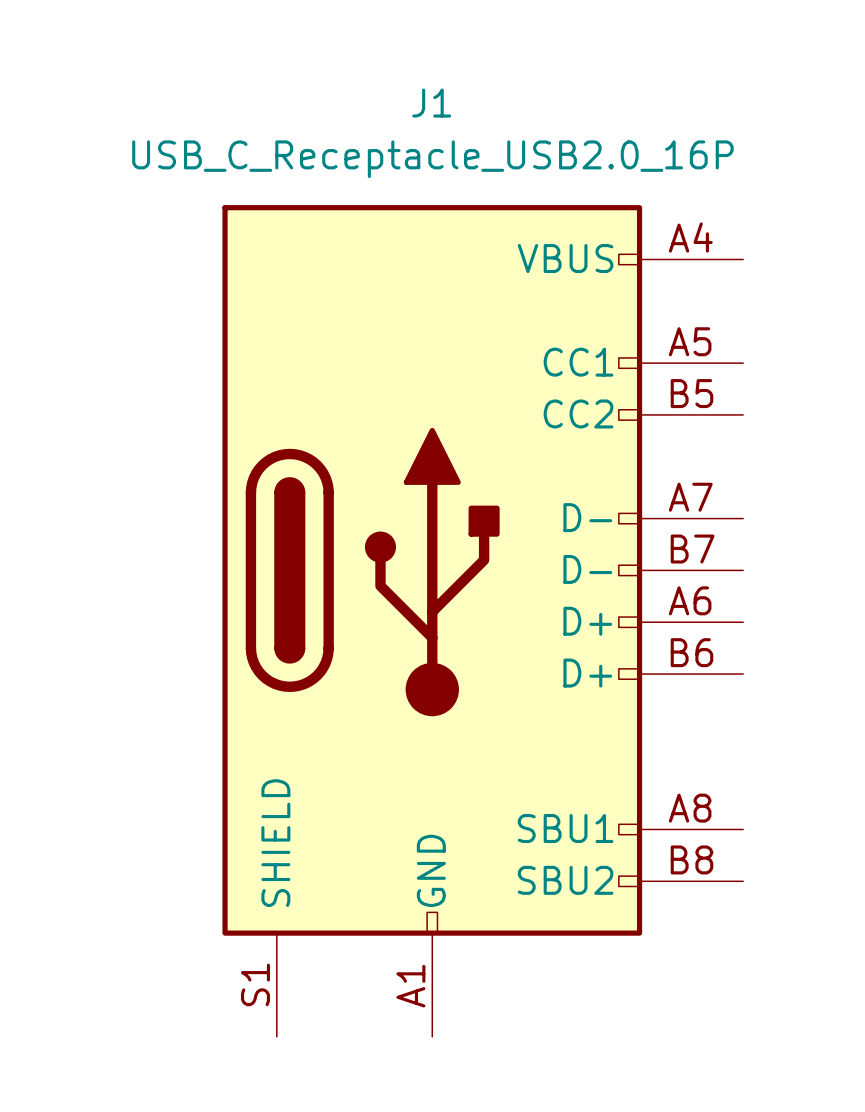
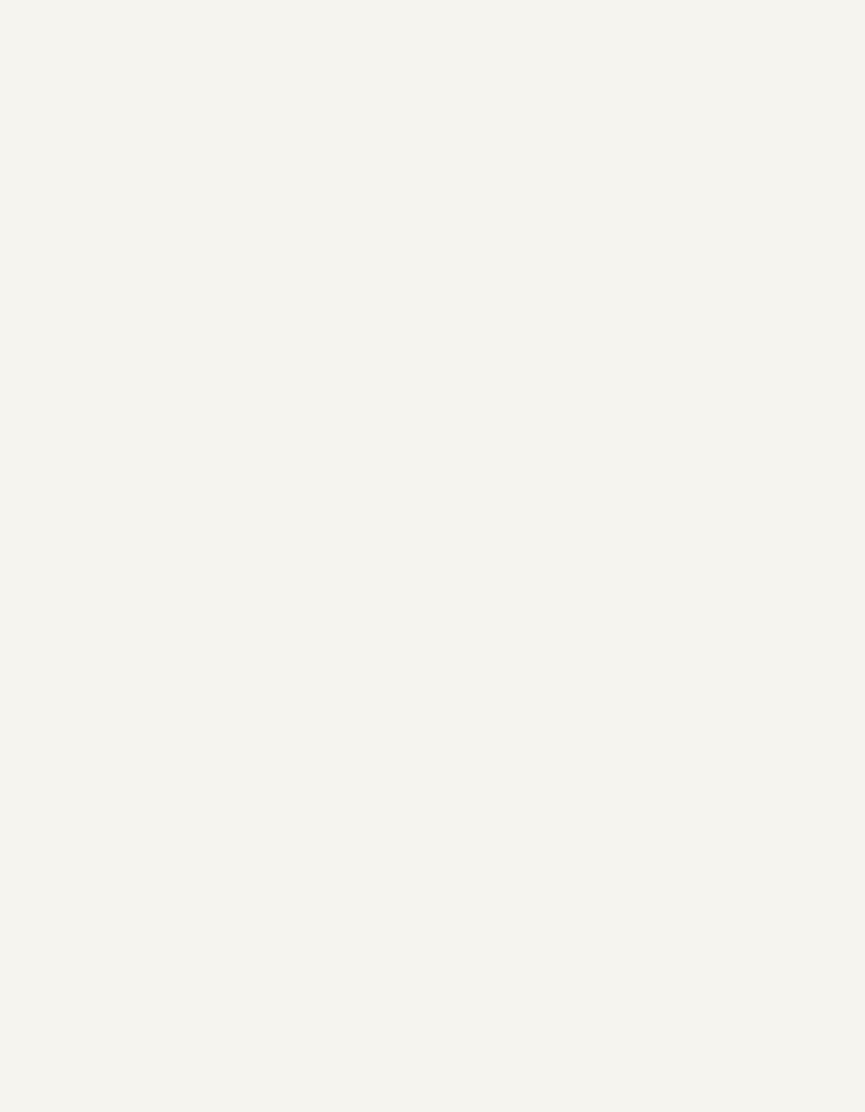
J1: USB_C_Receptacle_USB2.0_16P (482, 620) -> none

